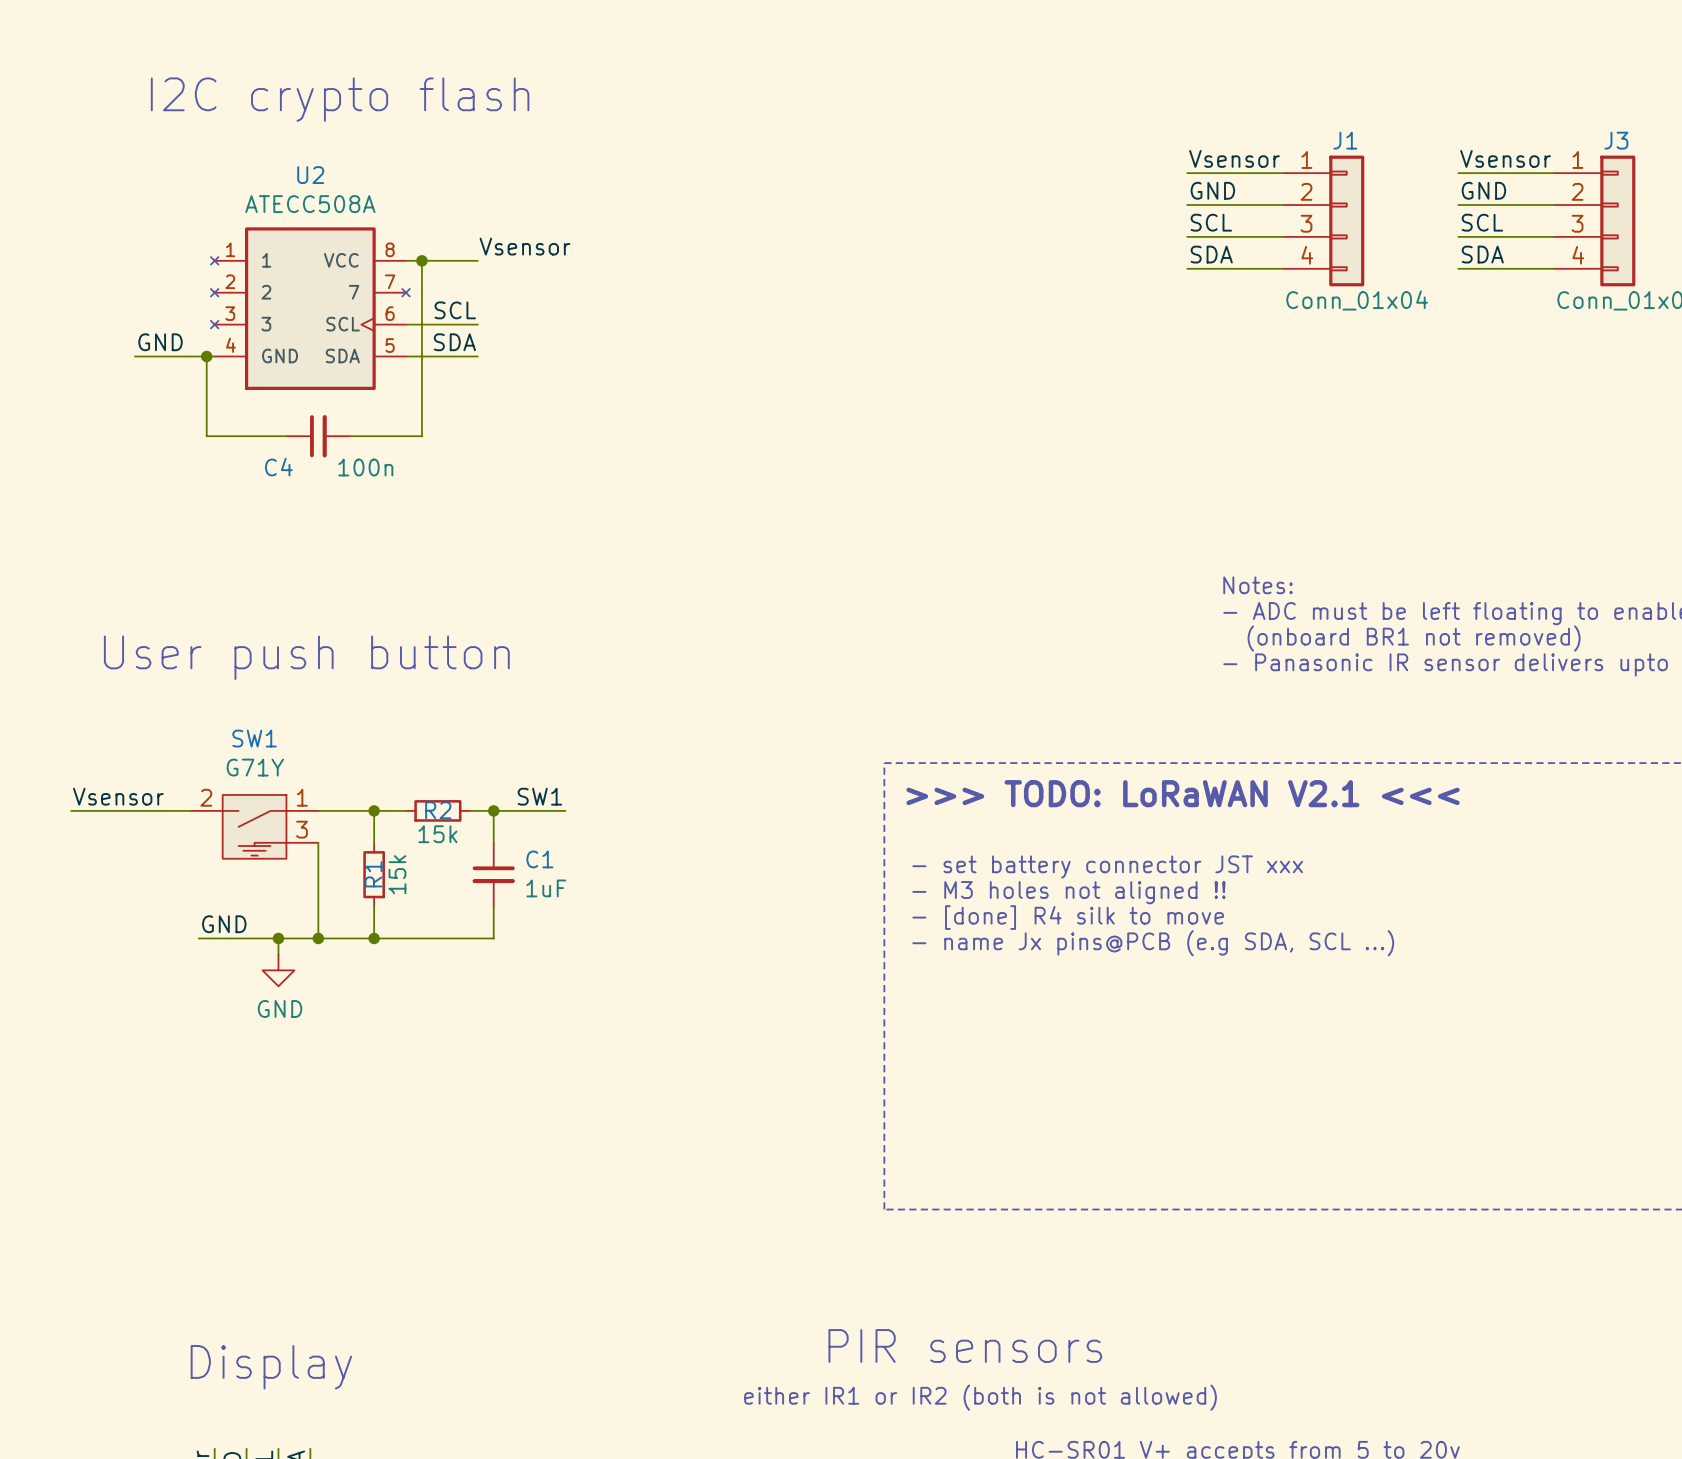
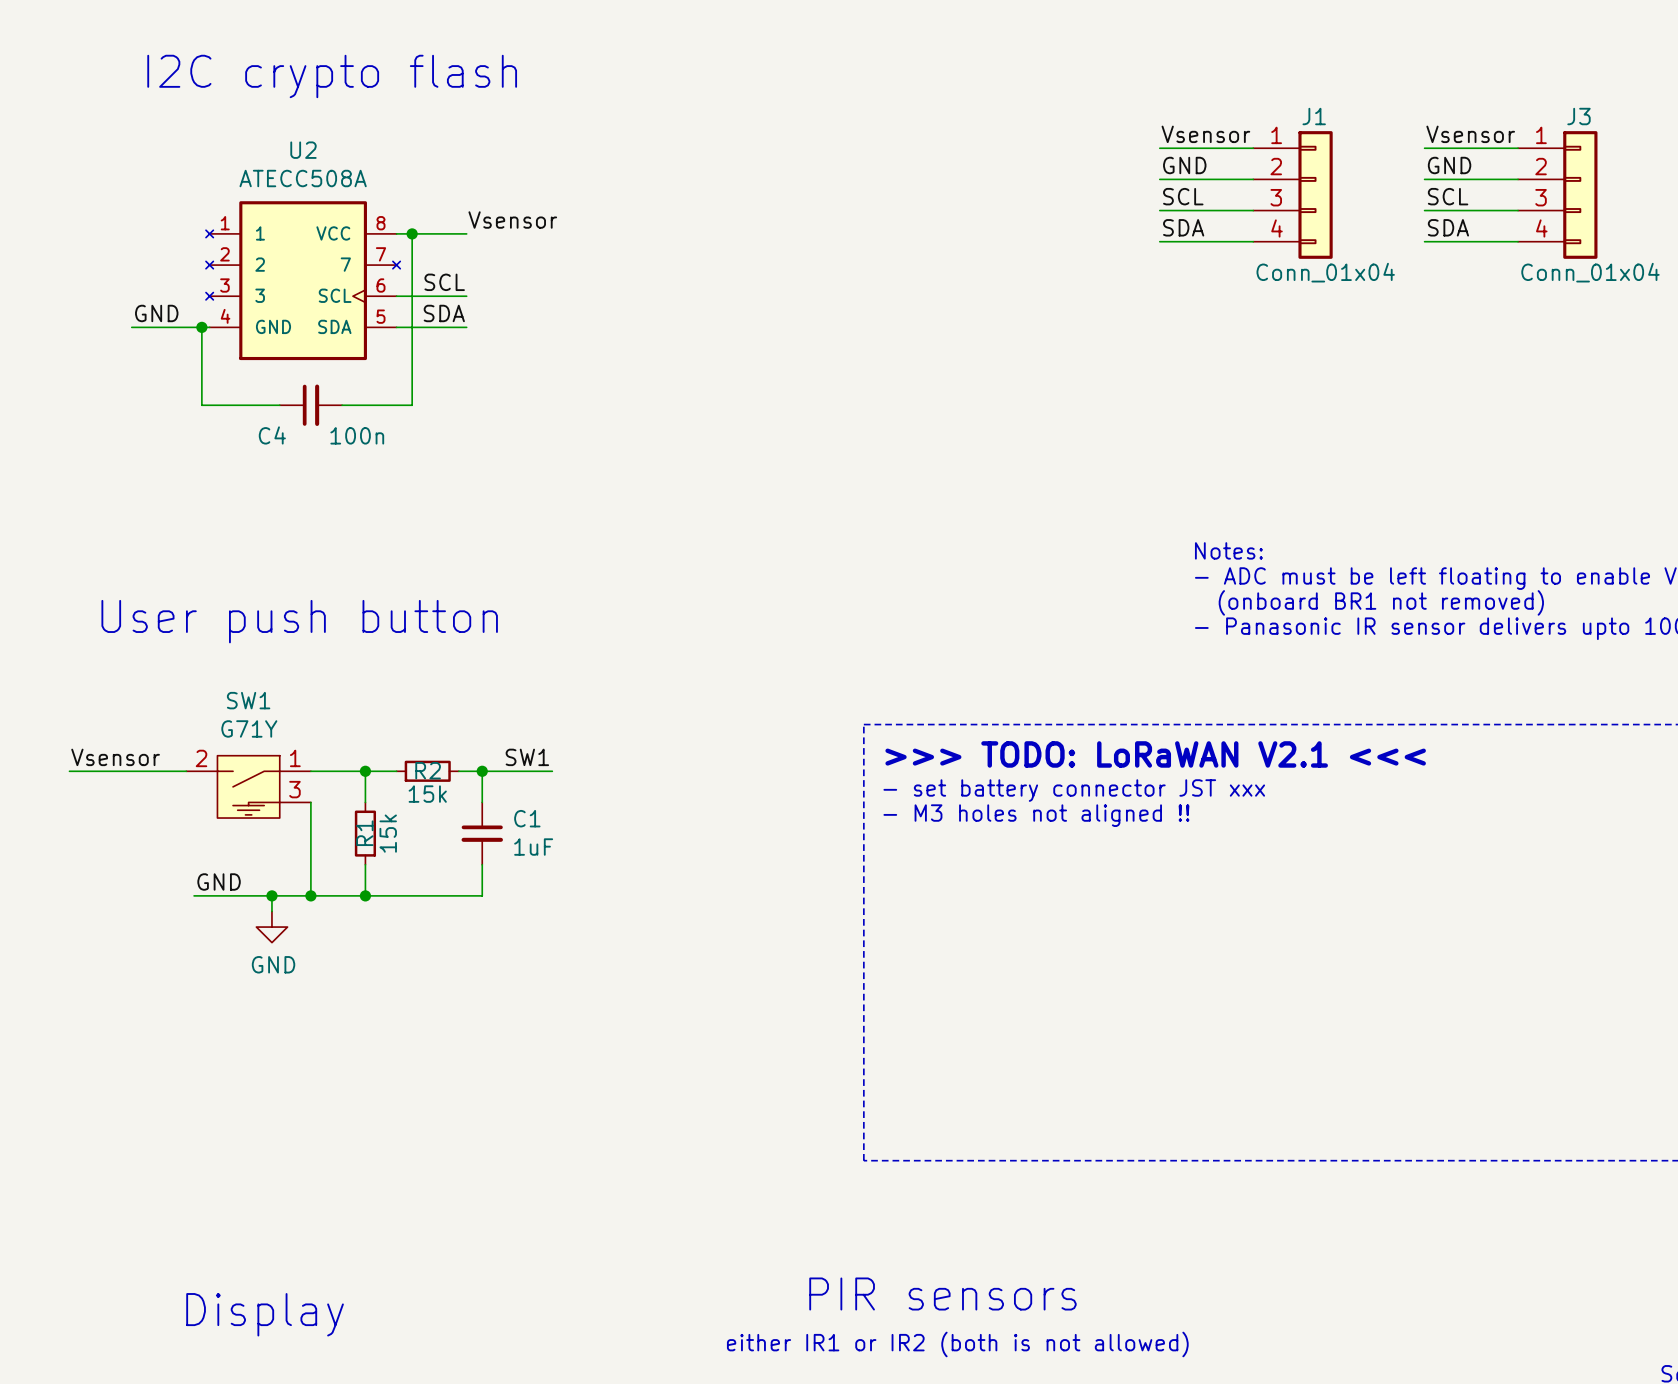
text position: - set battery connector JST xxx (1107, 866) -> - set battery connector JST xxx (1074, 790)
text position: - M3 holes not aligned !! (1068, 892) -> - M3 holes not aligned !! (1036, 815)
text: - [done] R4 silk to move (1068, 917) -> none
text: - name Jx pins@PCB (e.g SDA, SCL ...) (1153, 943) -> none

